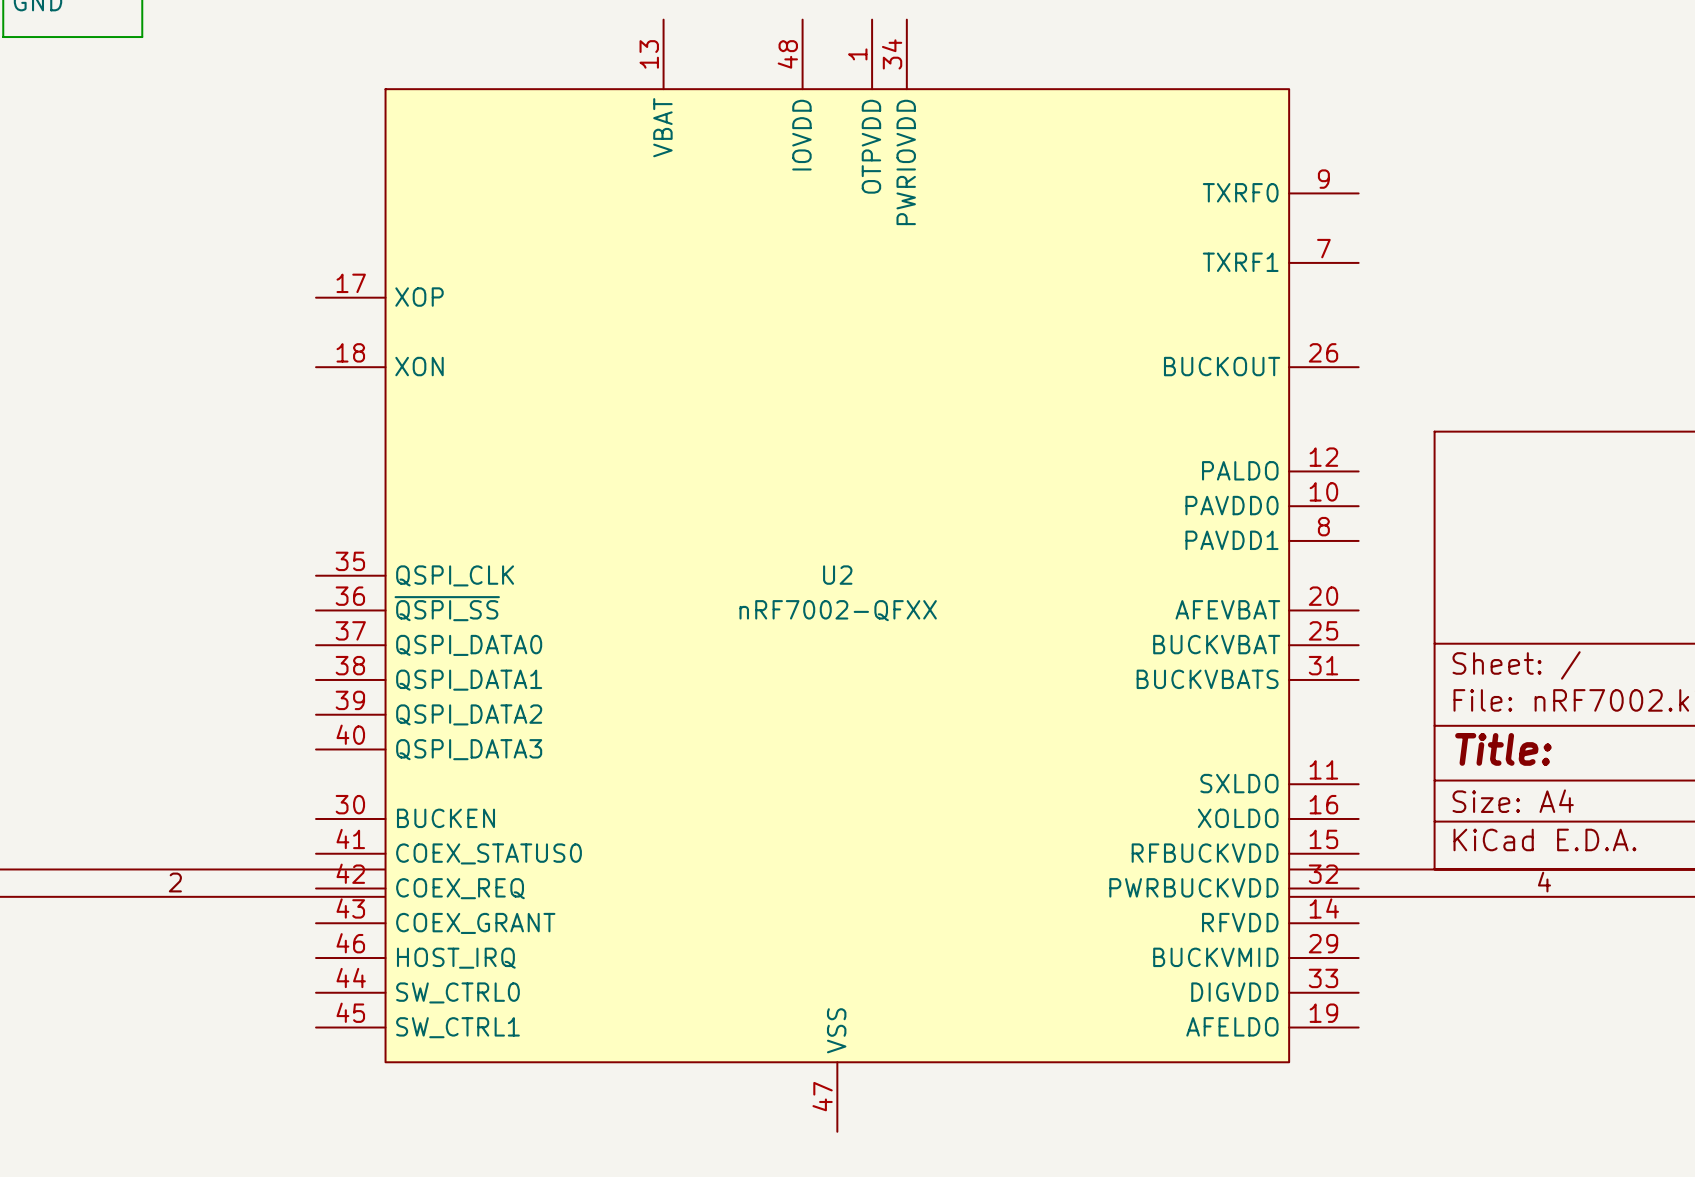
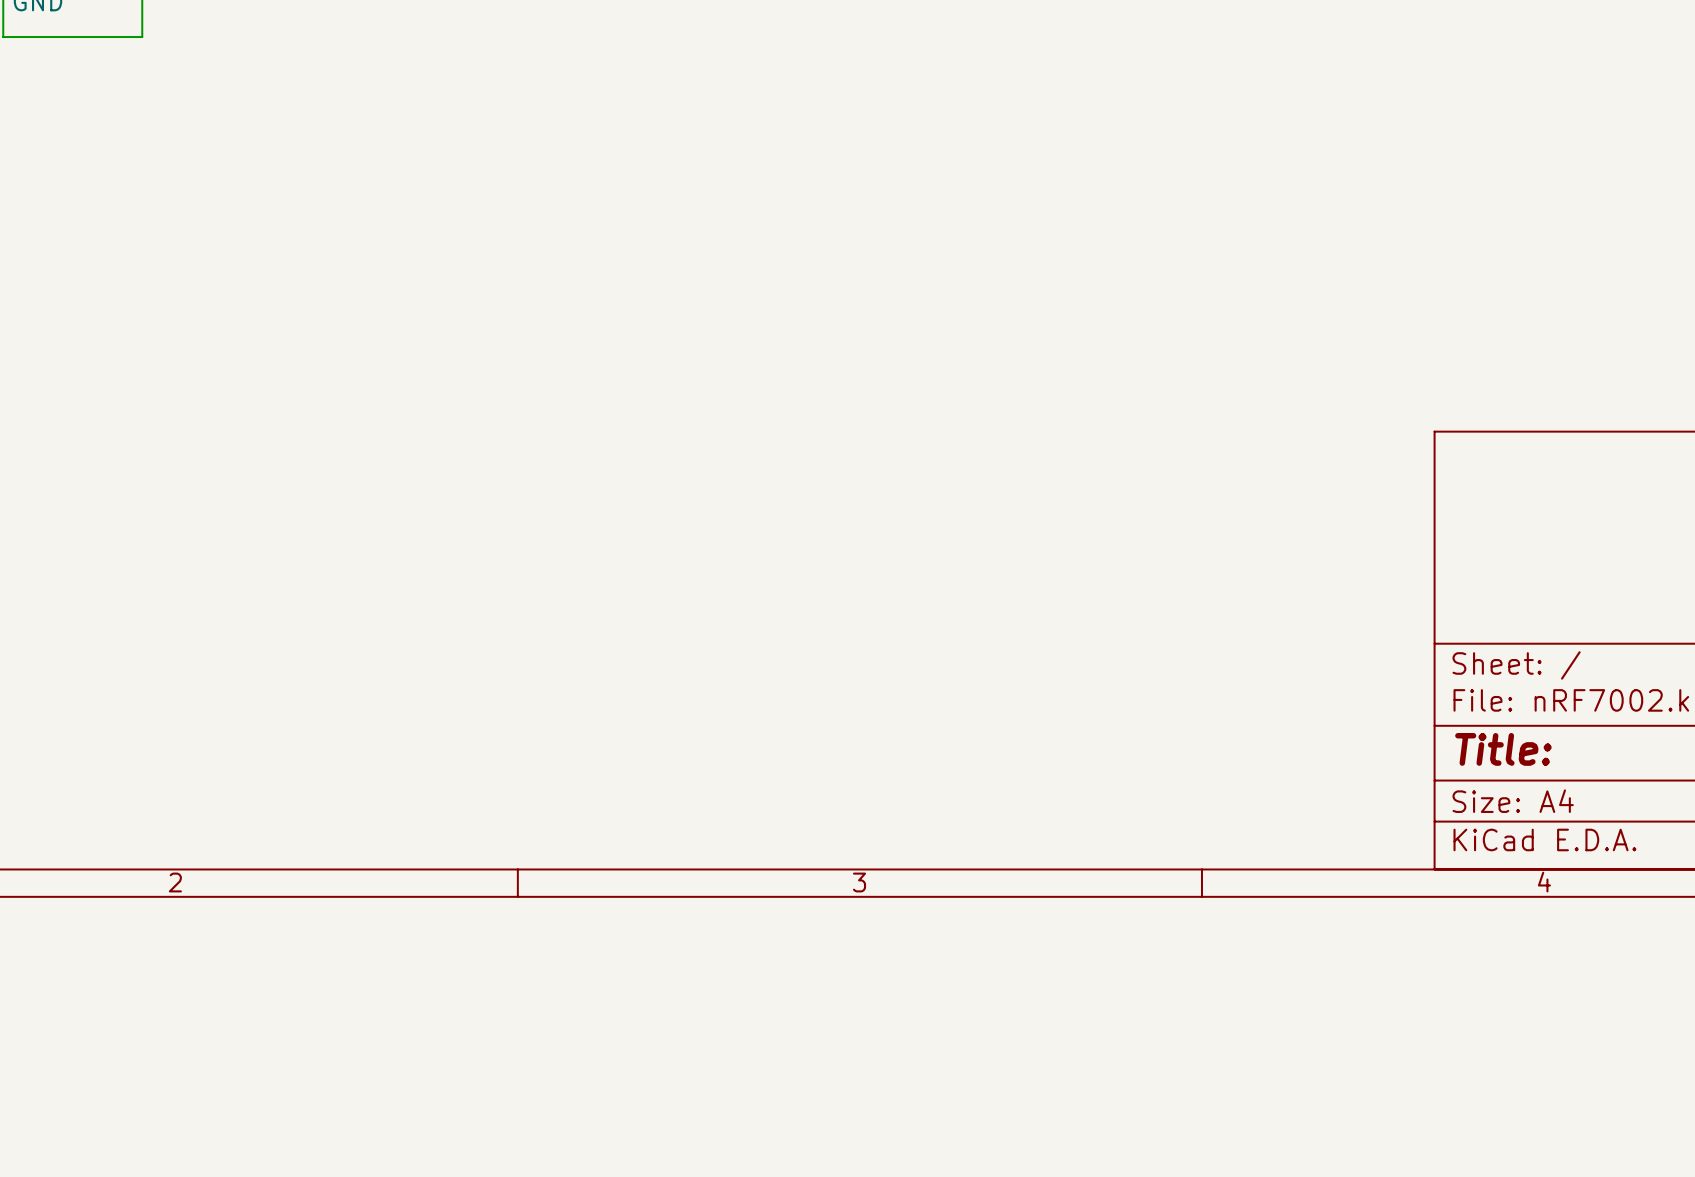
U2: nRF7002-QFXX (837, 575) -> none

